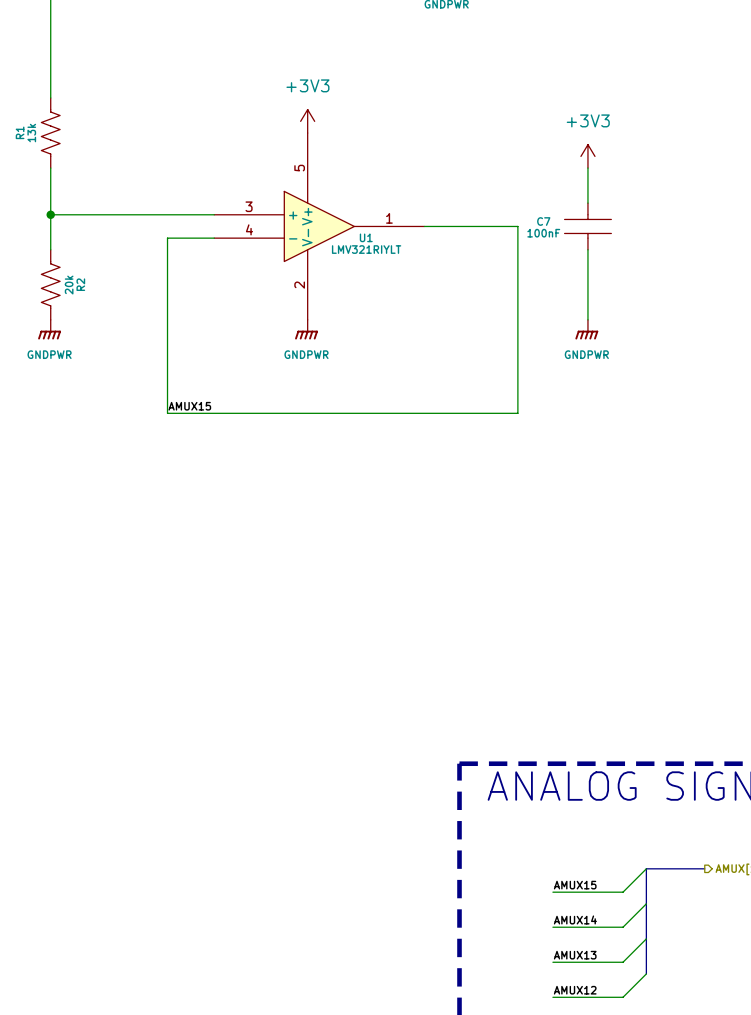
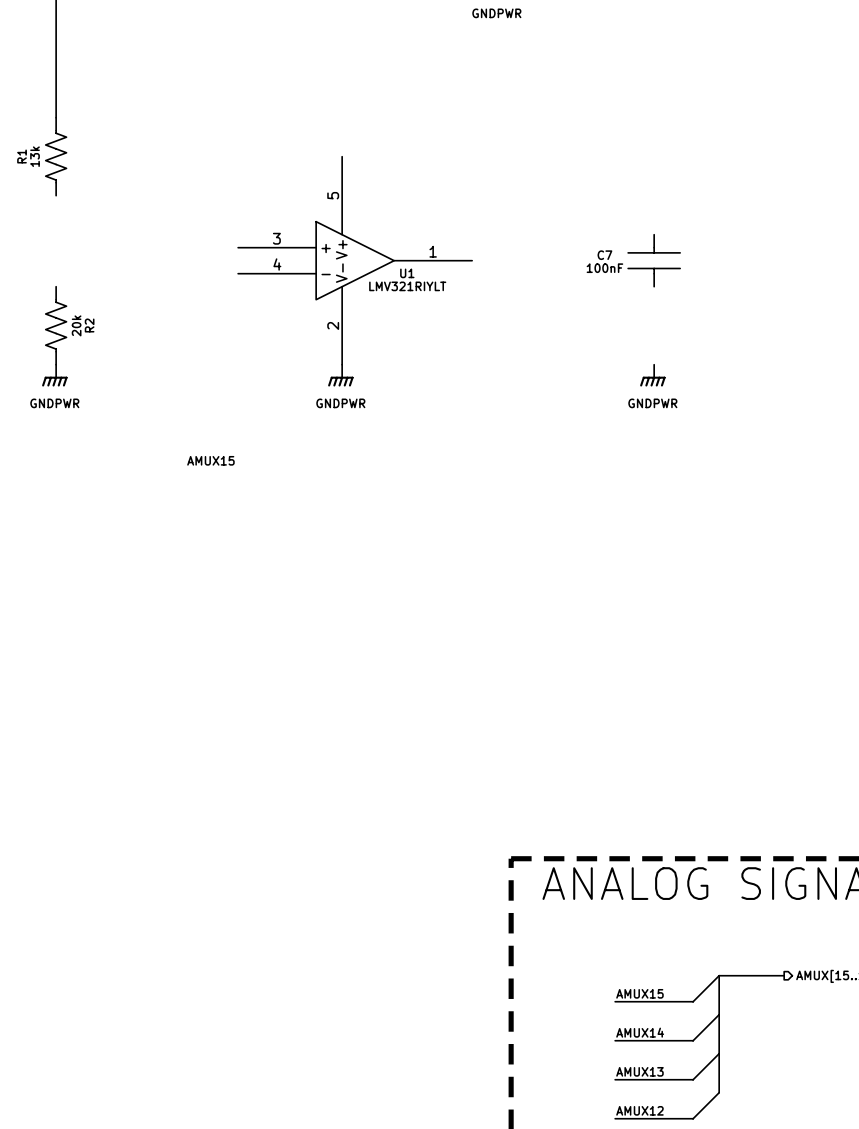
power symbol: +3V3 (307, 121) -> none
power symbol: +3V3 (587, 156) -> none
wire: (50, 168) (50, 249) -> none
wire: (587, 168) (587, 203) -> none
wire: (50, 214) (214, 214) -> none
junction: (50, 214) -> none
wire: (424, 226) (517, 226) (517, 413) (167, 413) (167, 238) (214, 238) -> none
wire: (587, 249) (587, 319) -> none

